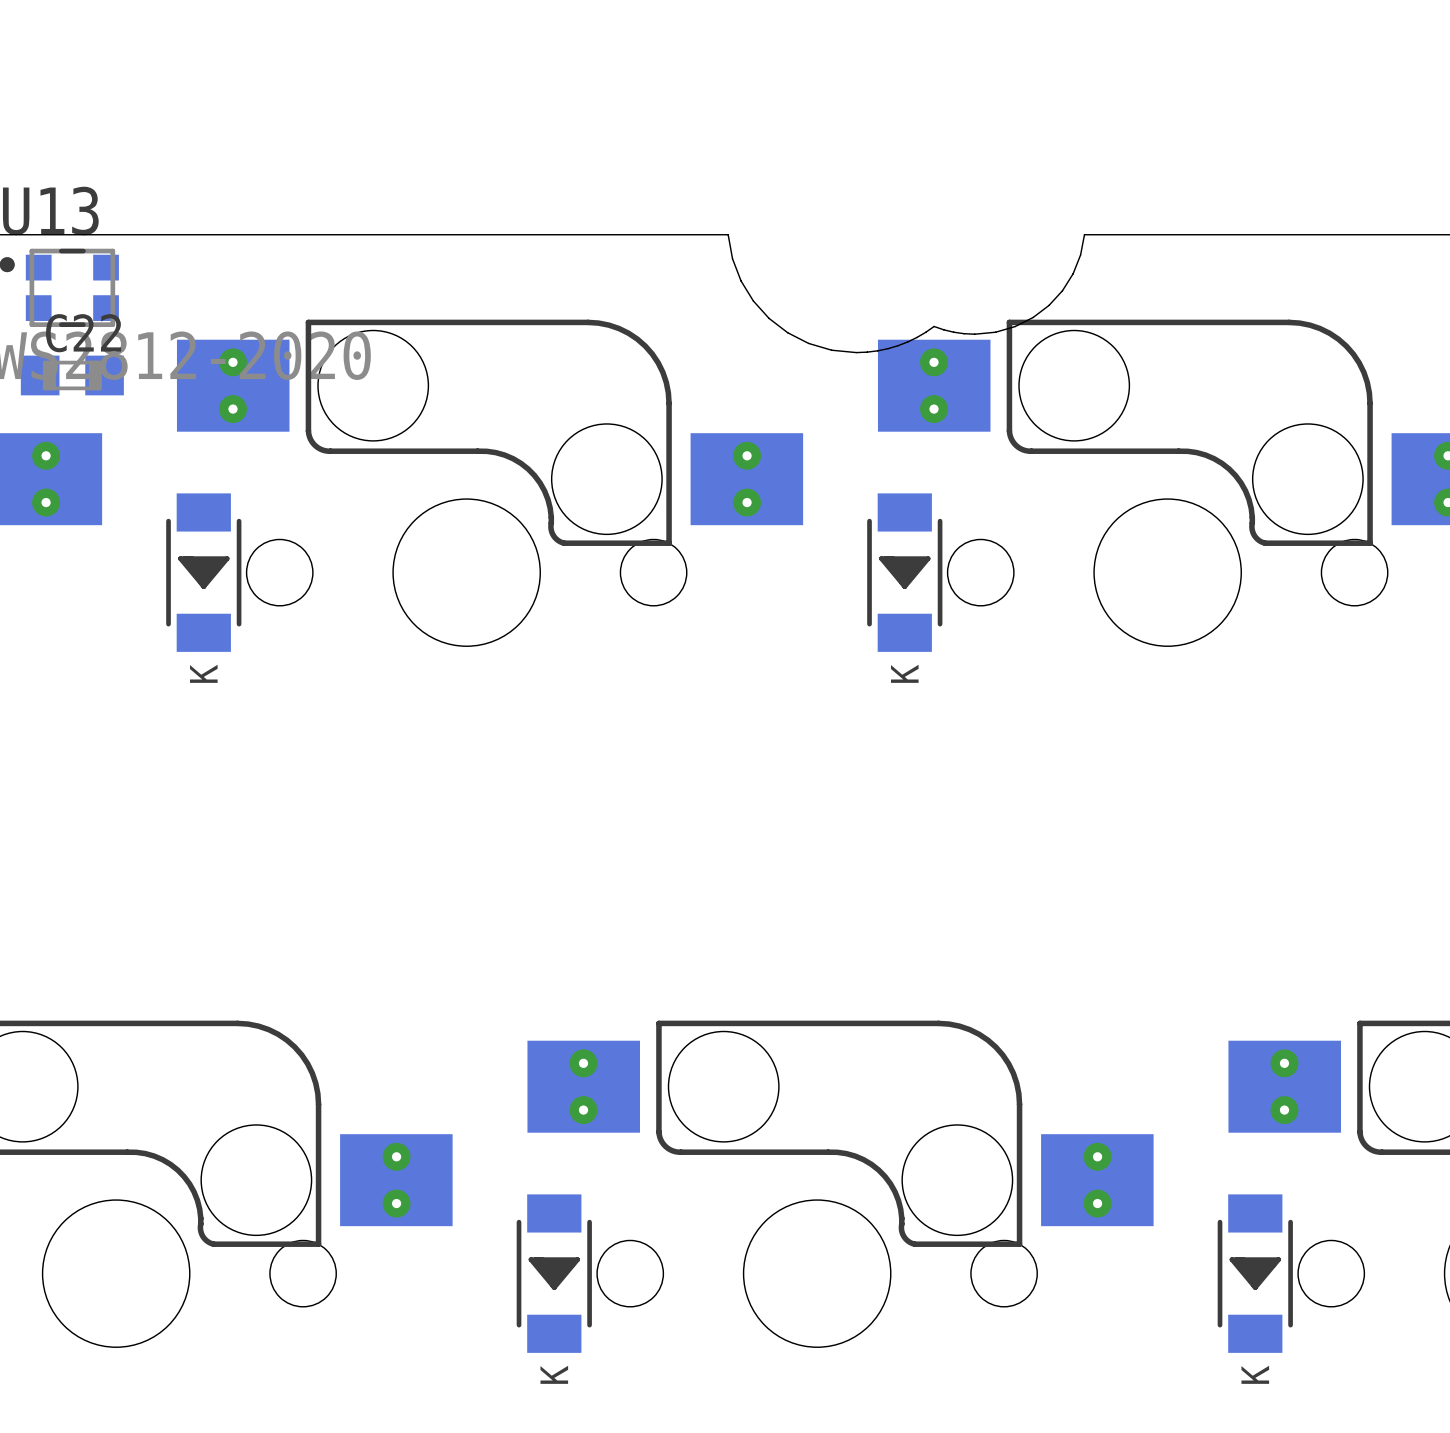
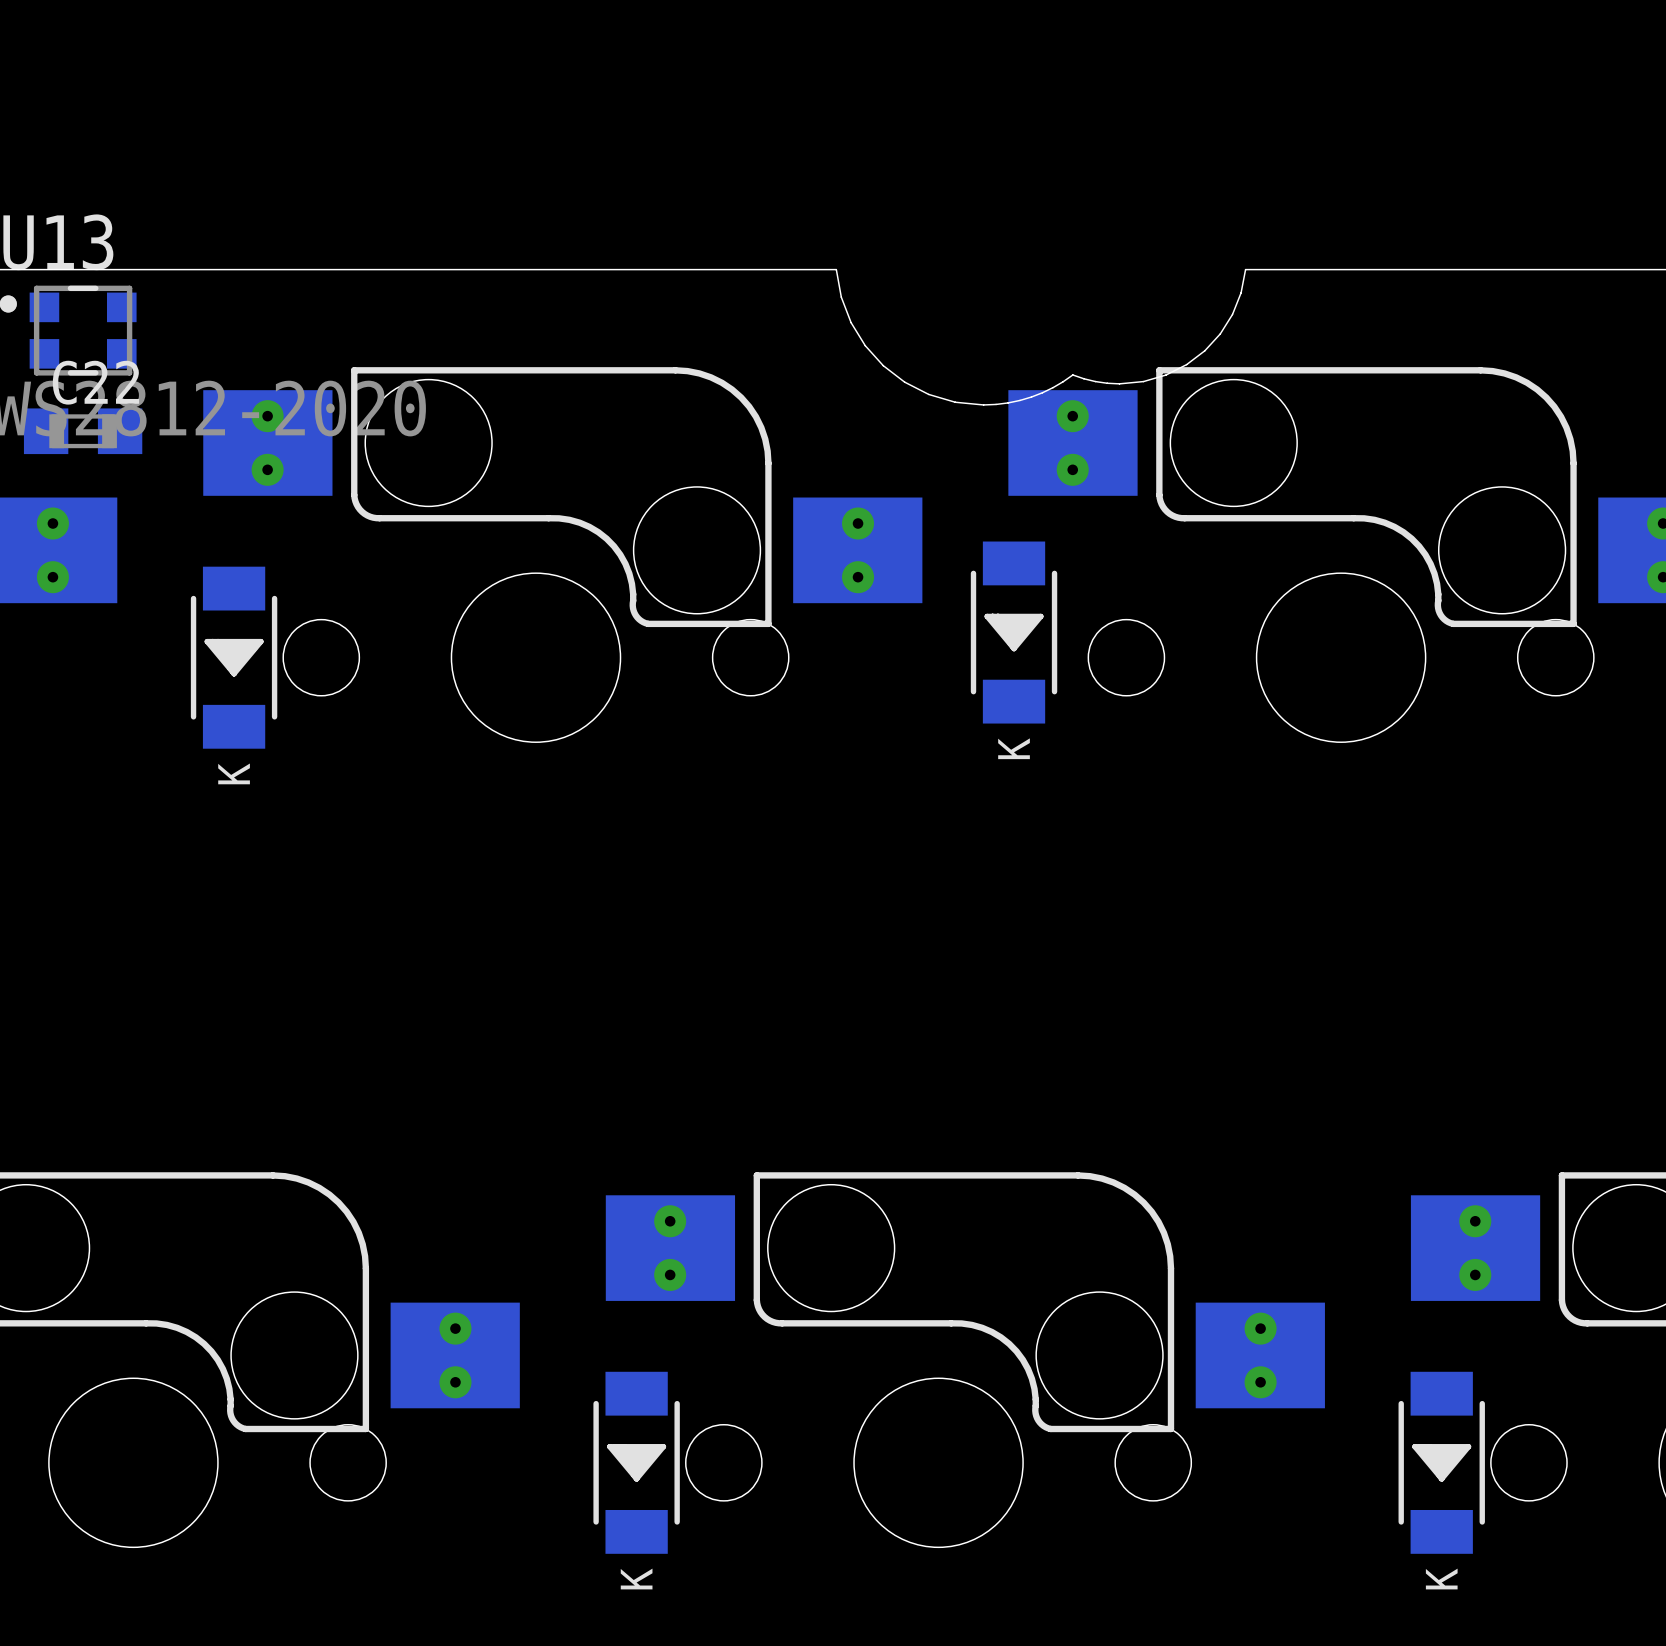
part position: (904, 572) -> (1014, 632)

